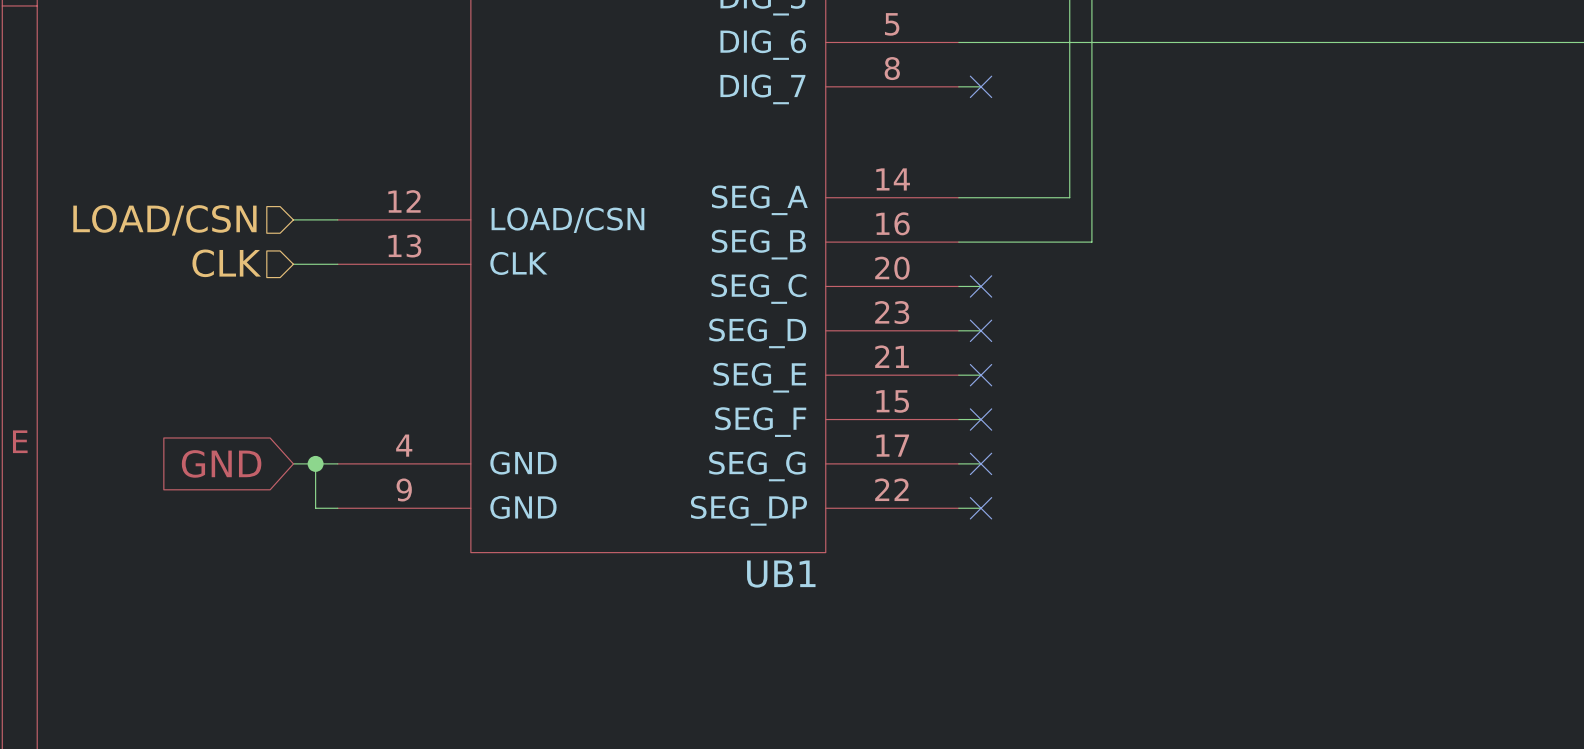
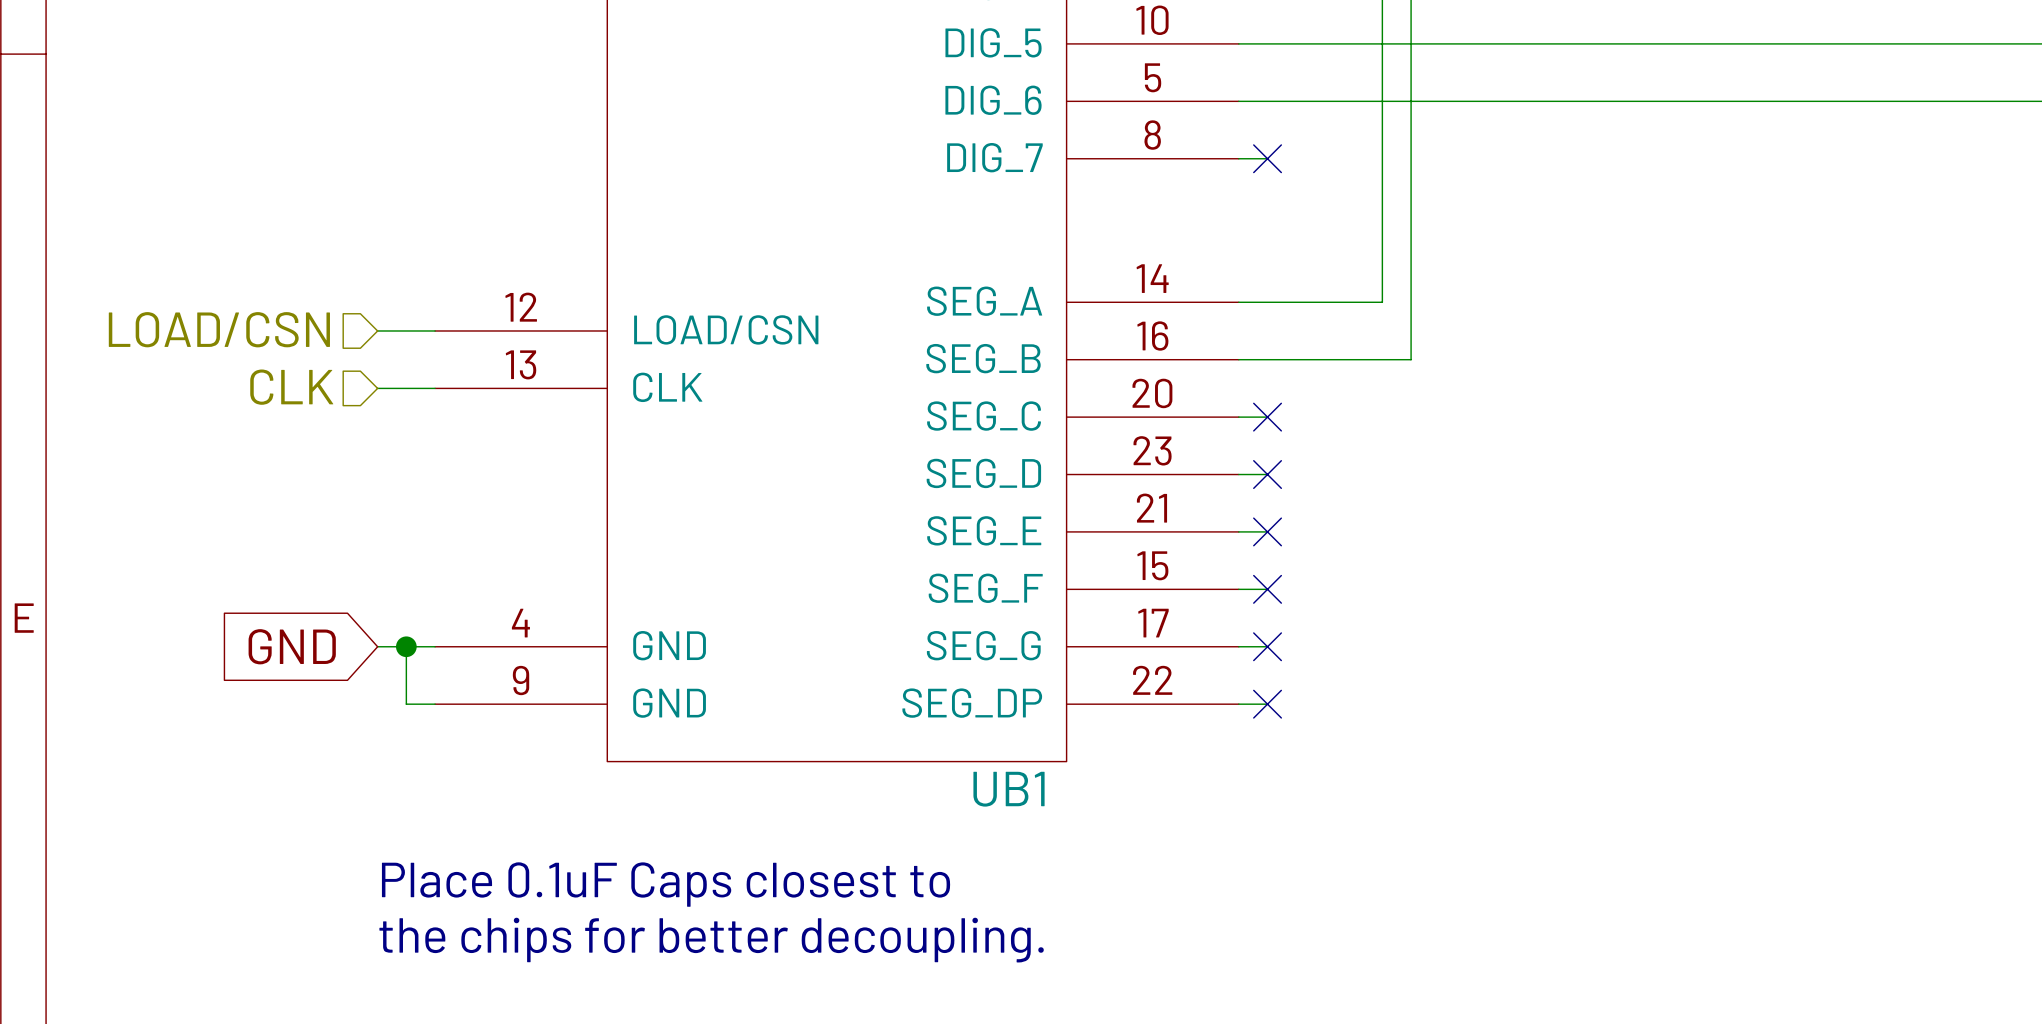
text: none -> Place 0.1uF Caps closest to (666, 884)
text: none -> the chips for better decoupling. (711, 940)

